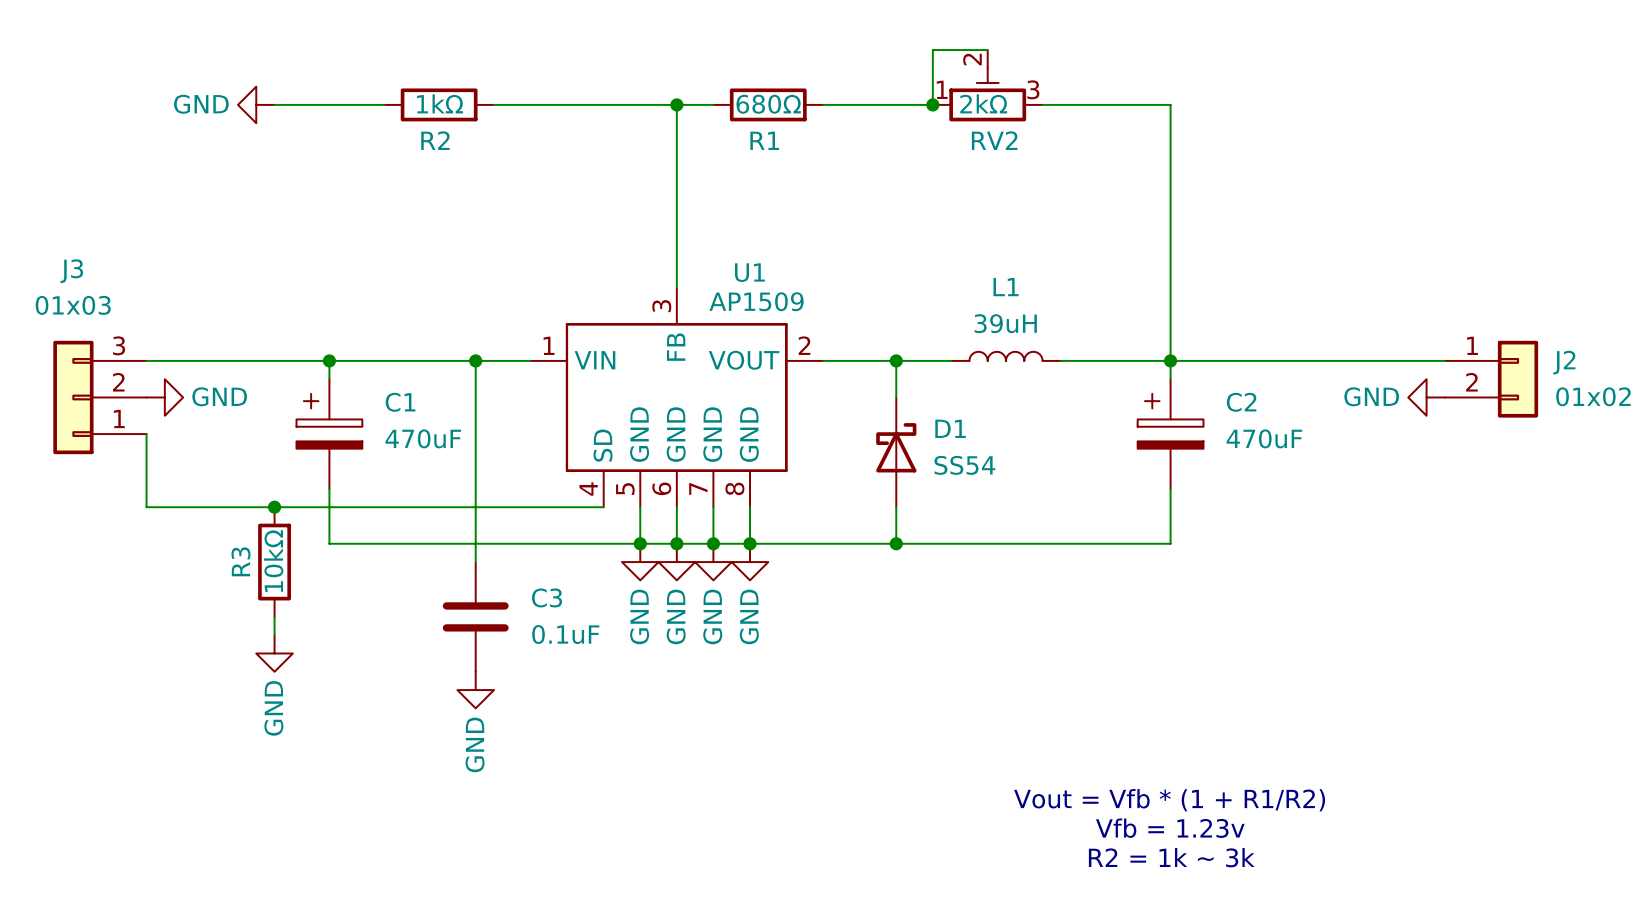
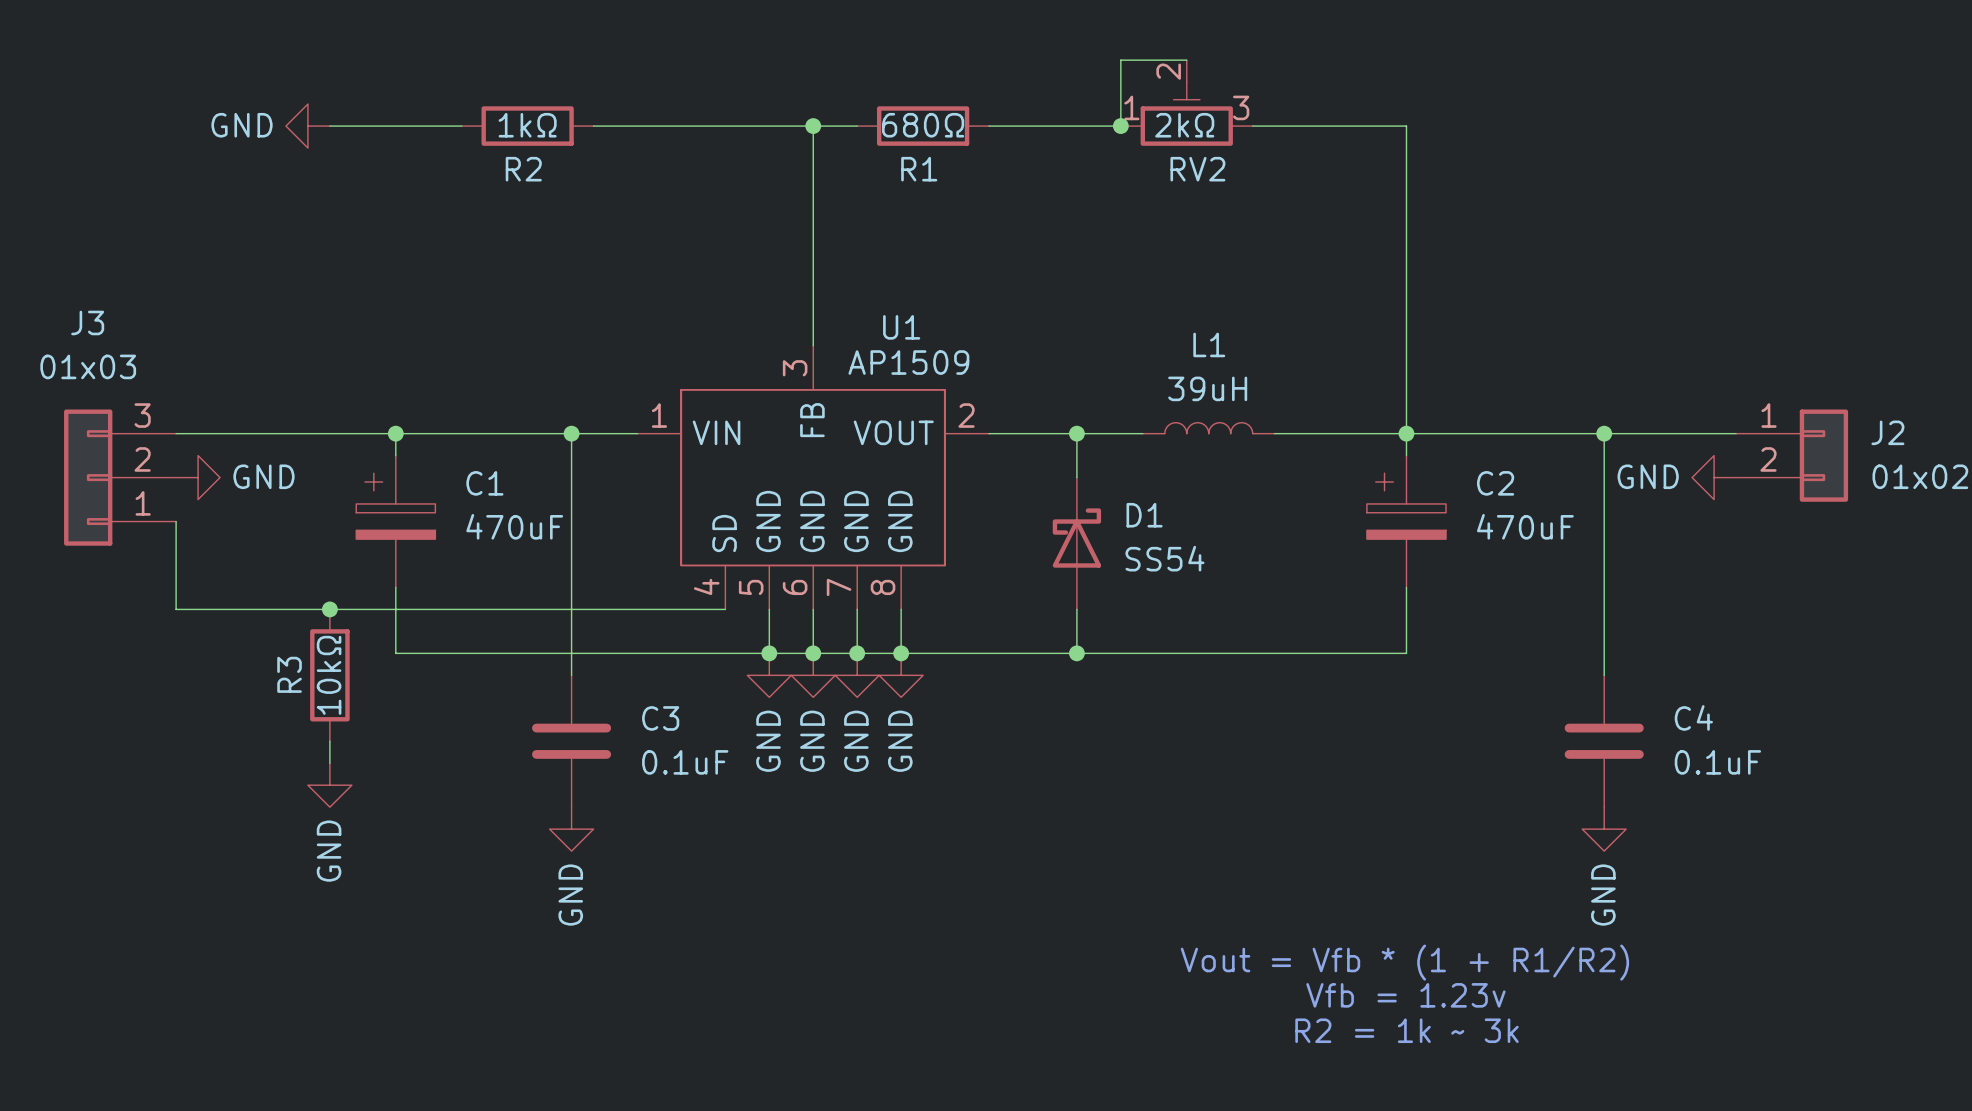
wire: none -> (1604, 433) (1604, 675)
junction: none -> (1604, 433)
C4: none -> 0.1uF (1604, 741)
power symbol: none -> GND (1604, 829)

